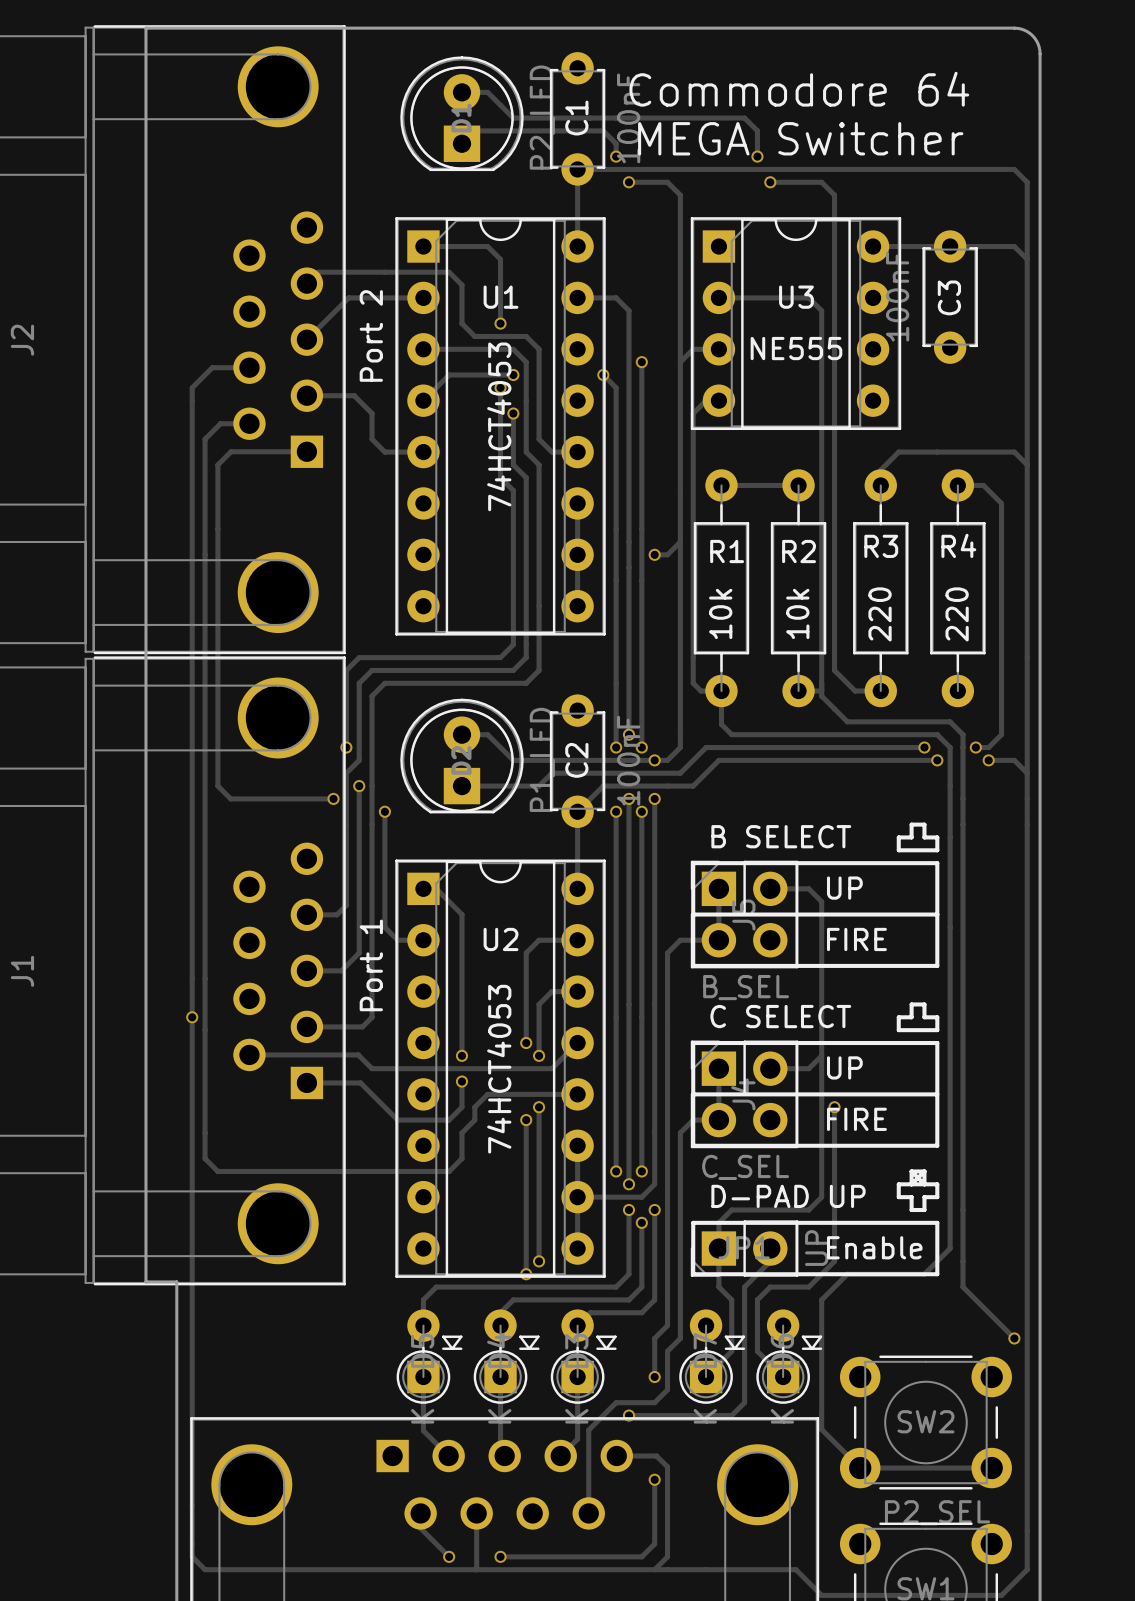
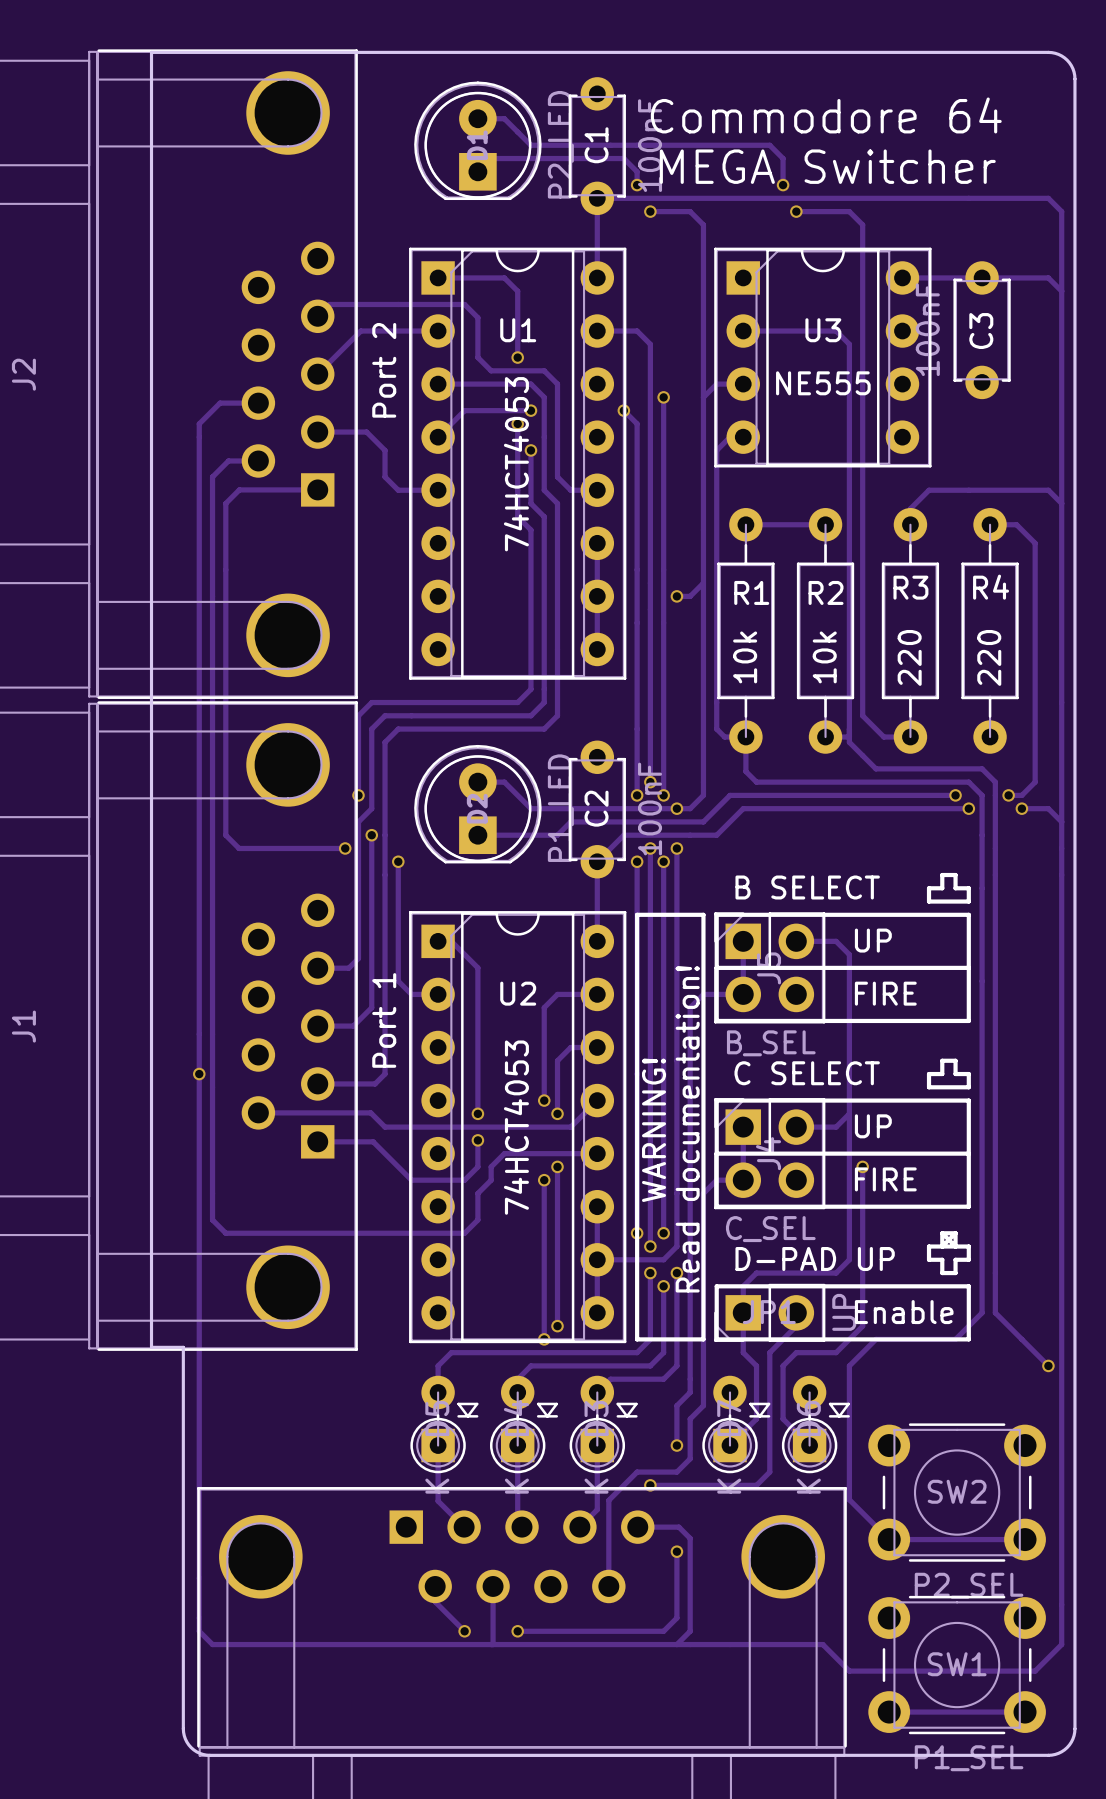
line: none -> (637, 914) (703, 914) (703, 1339) (637, 1339) (637, 914)
text: none -> Read documentation! (687, 1129)
text: none -> WARNING! (654, 1130)
track: (962, 1248) (962, 1287) (1014, 1338) -> (995, 1312) (1048, 1365)
via position: (1014, 1338) -> (1048, 1365)

